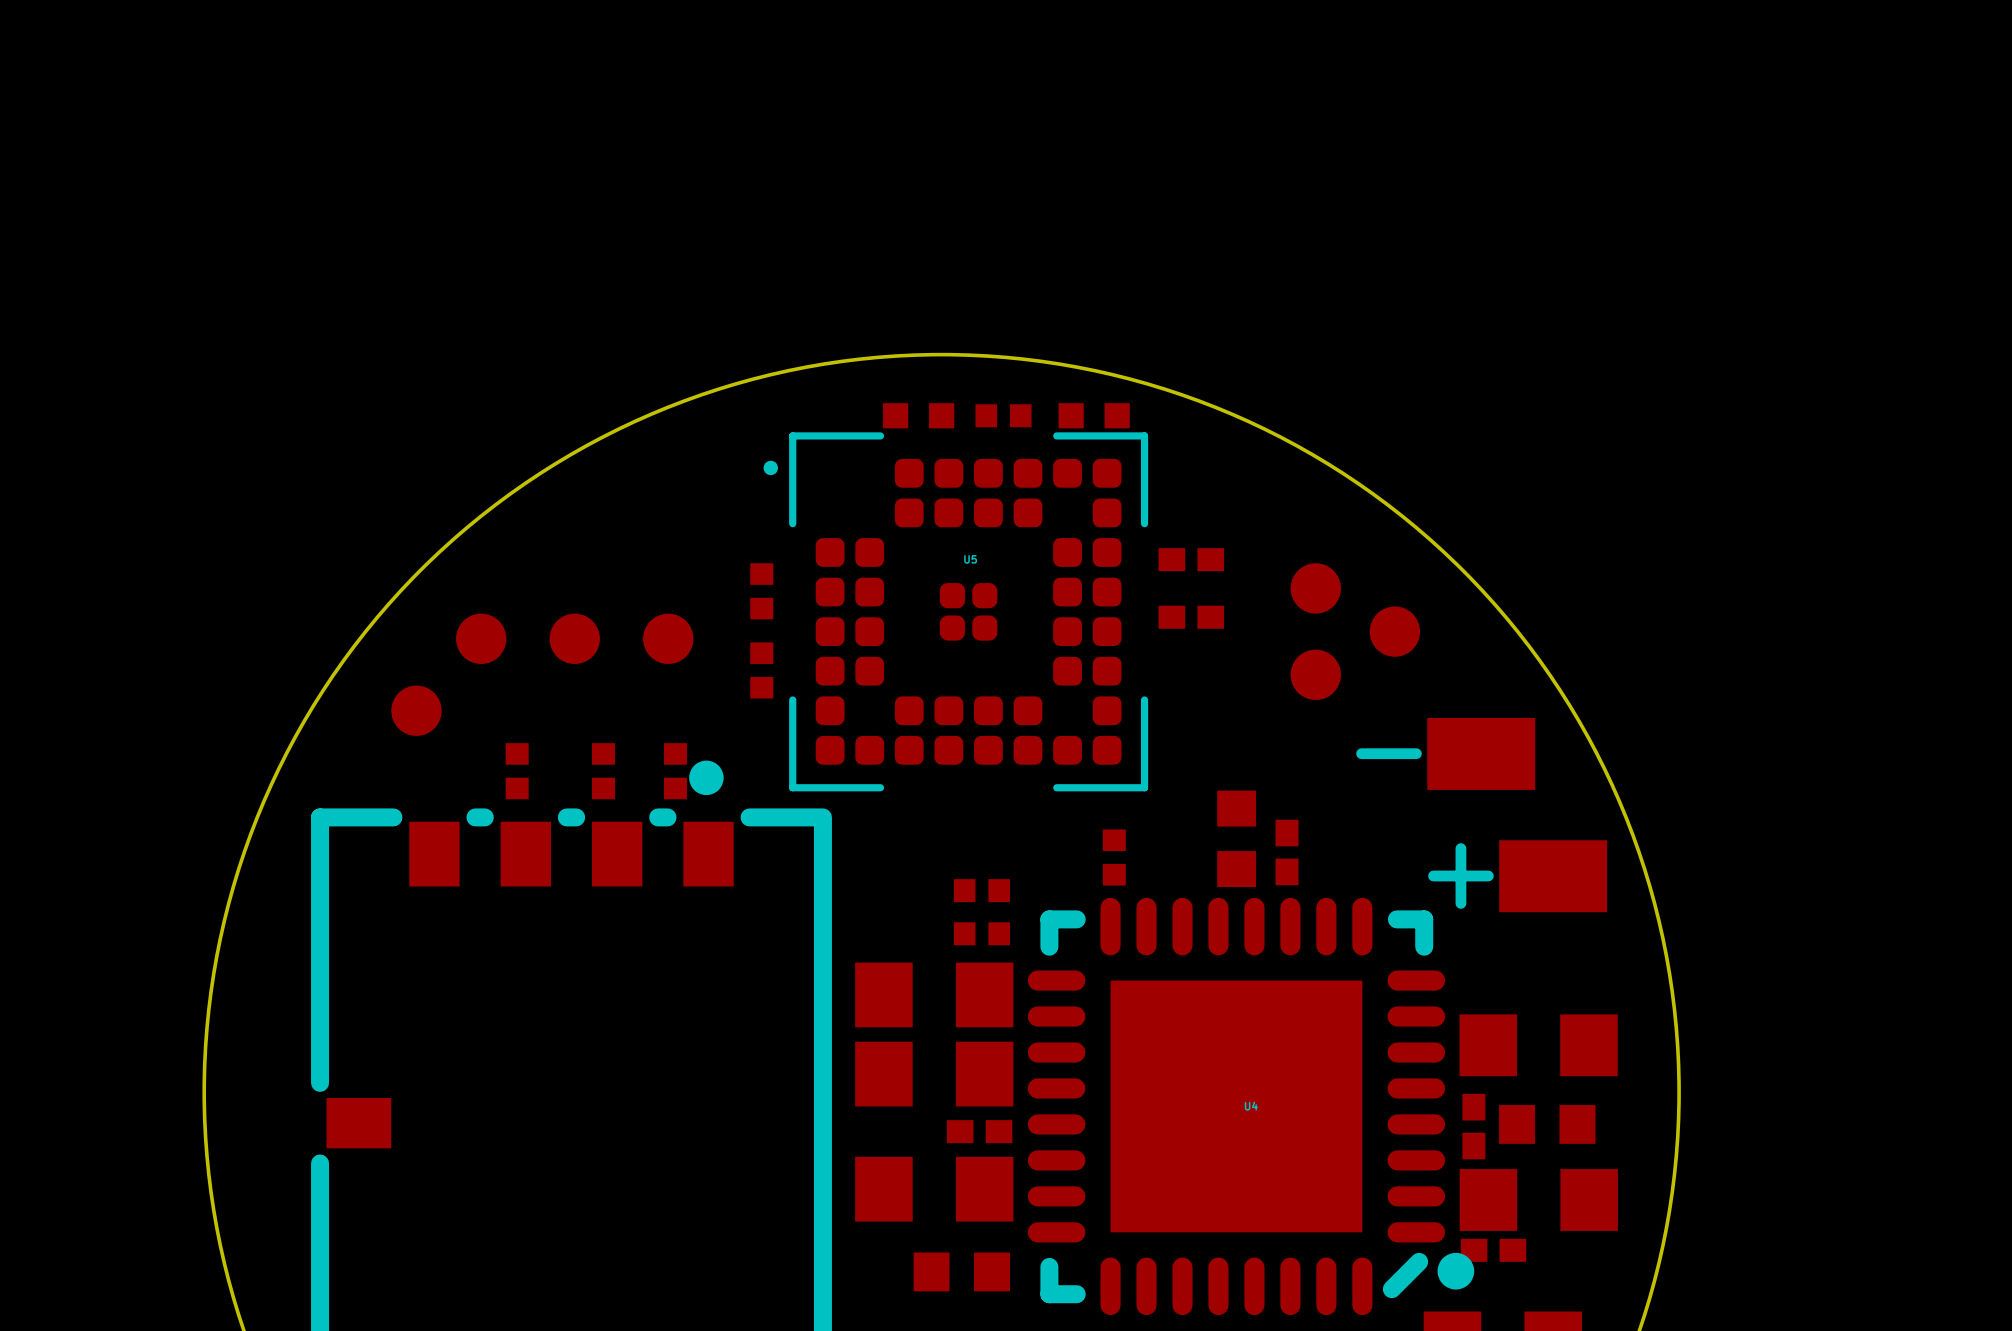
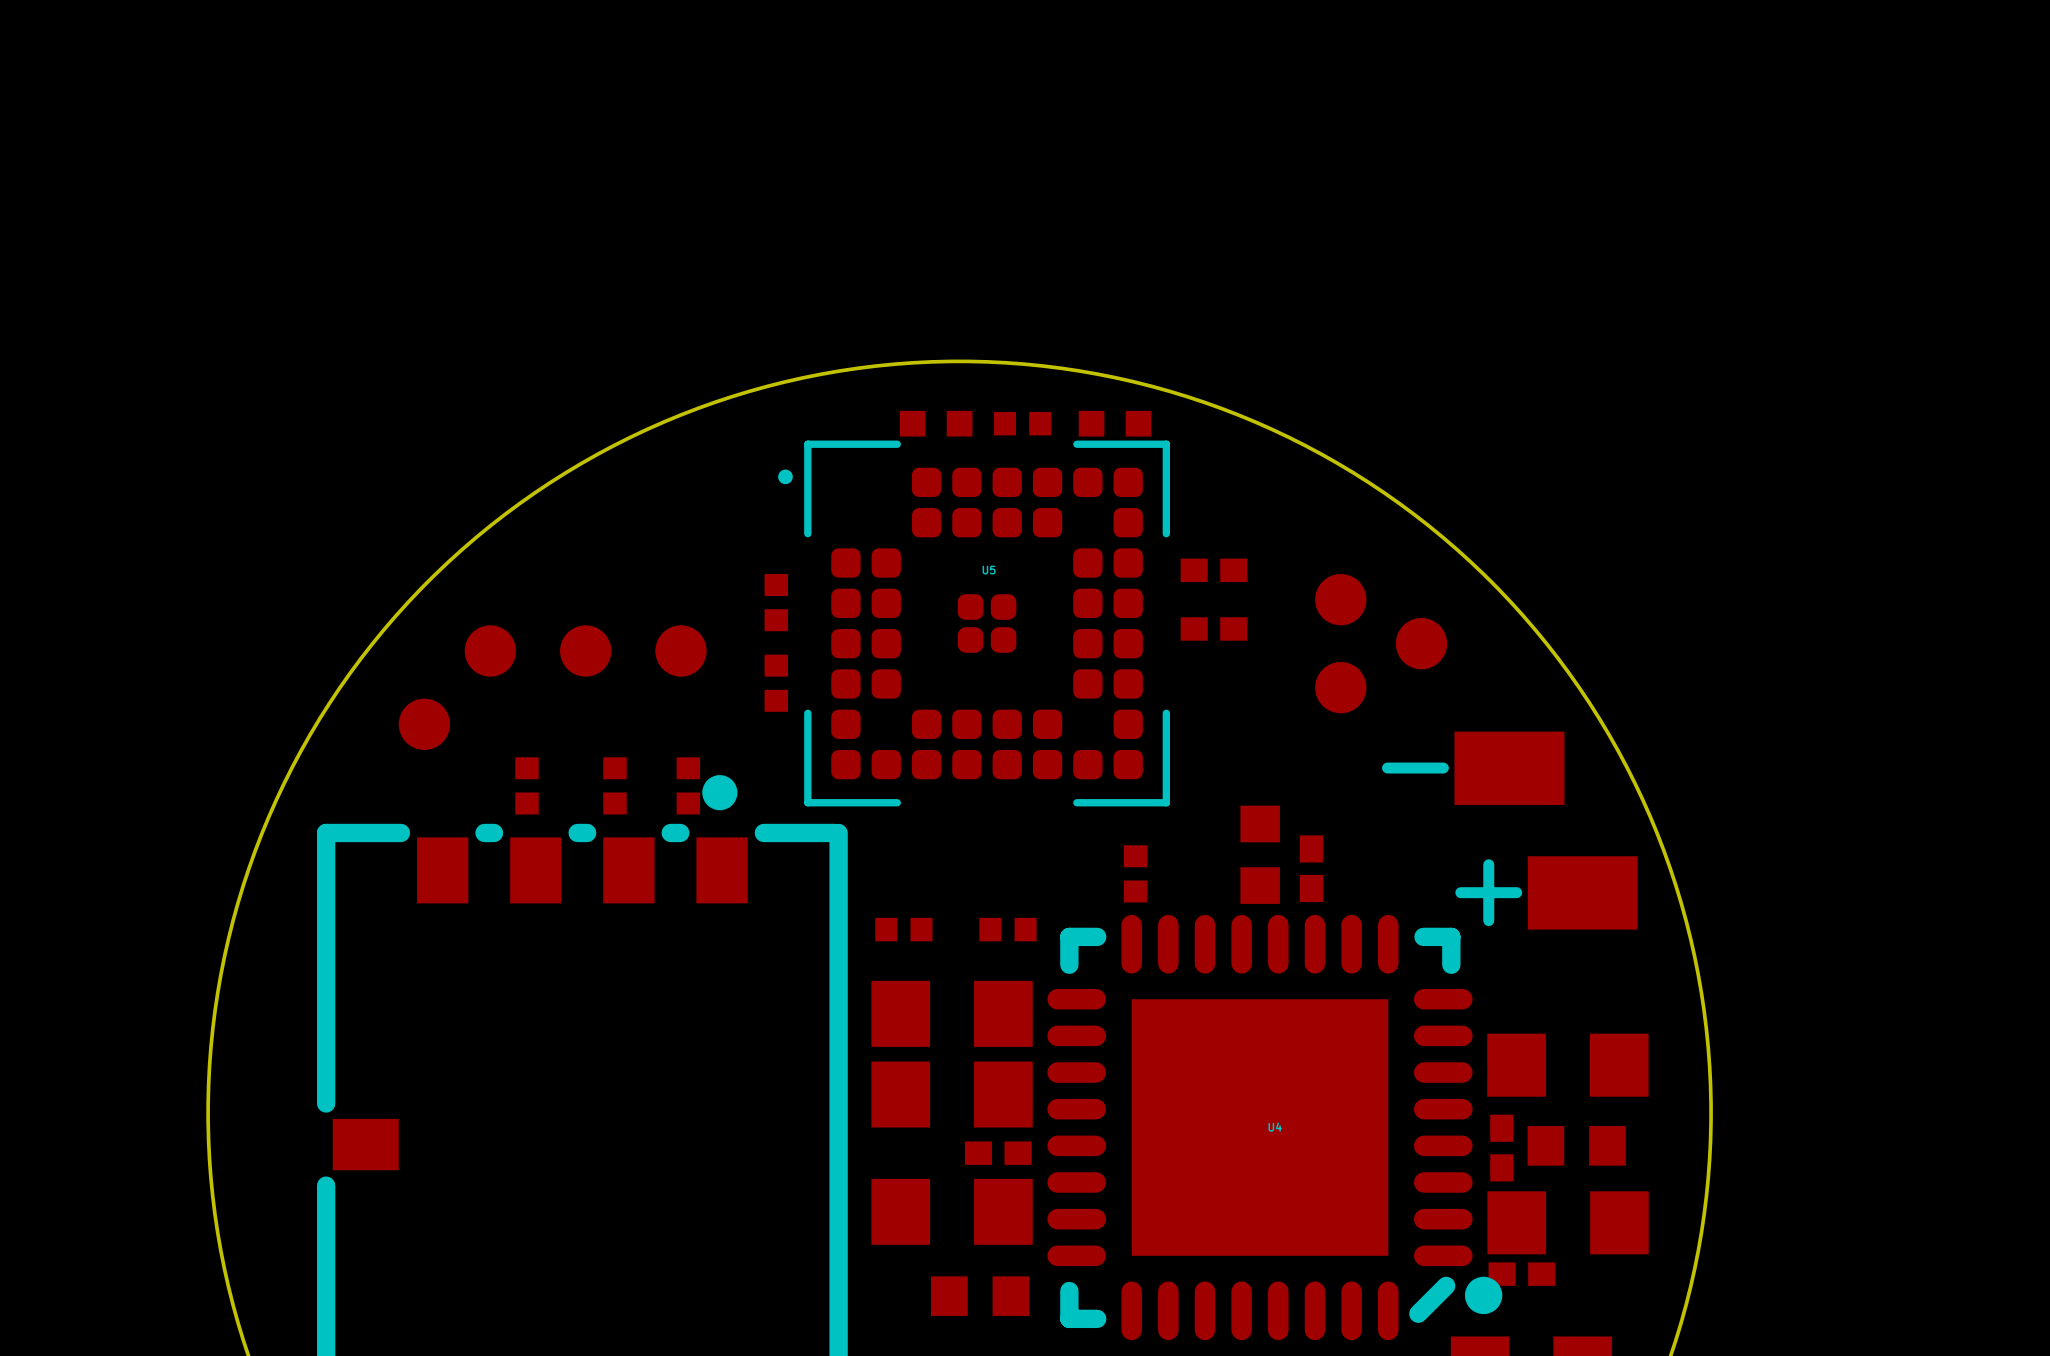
part: (981, 890) -> none
part: none -> (903, 929)
part: none -> (1007, 929)
part: (981, 933) -> none

